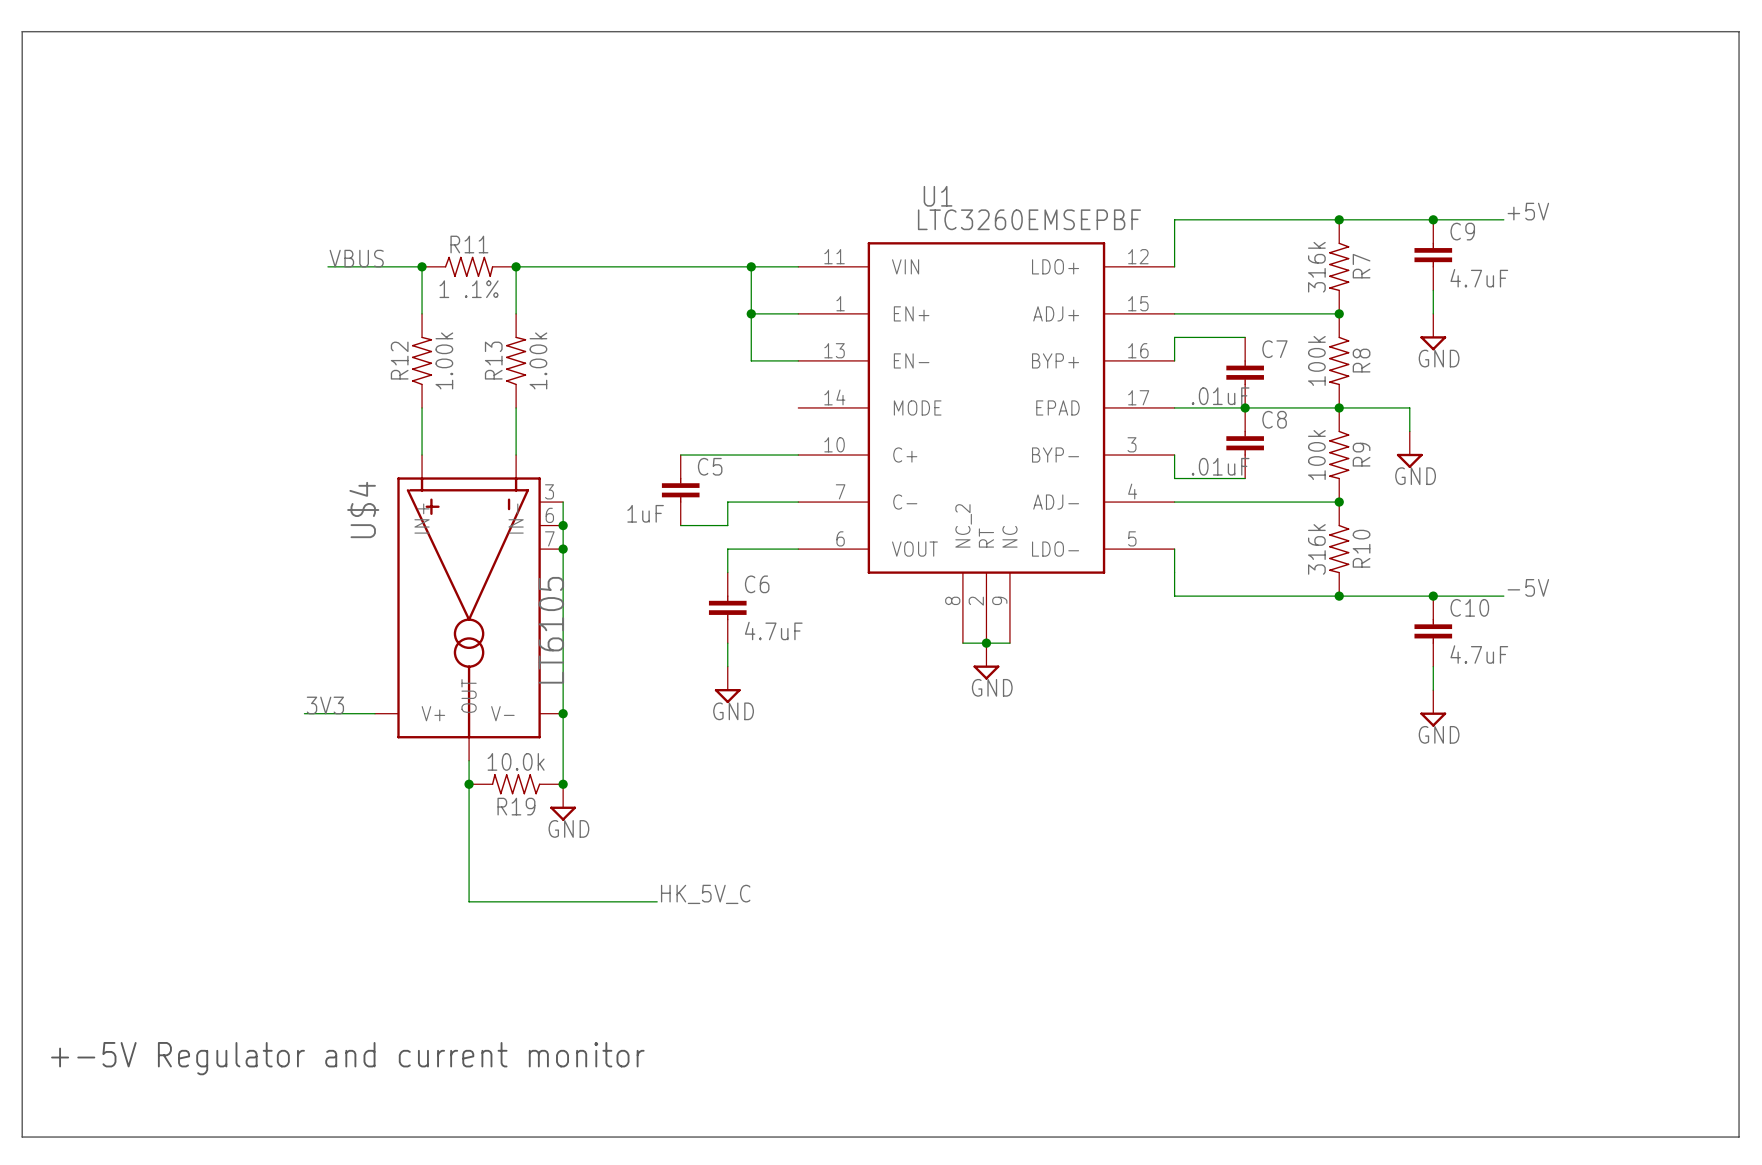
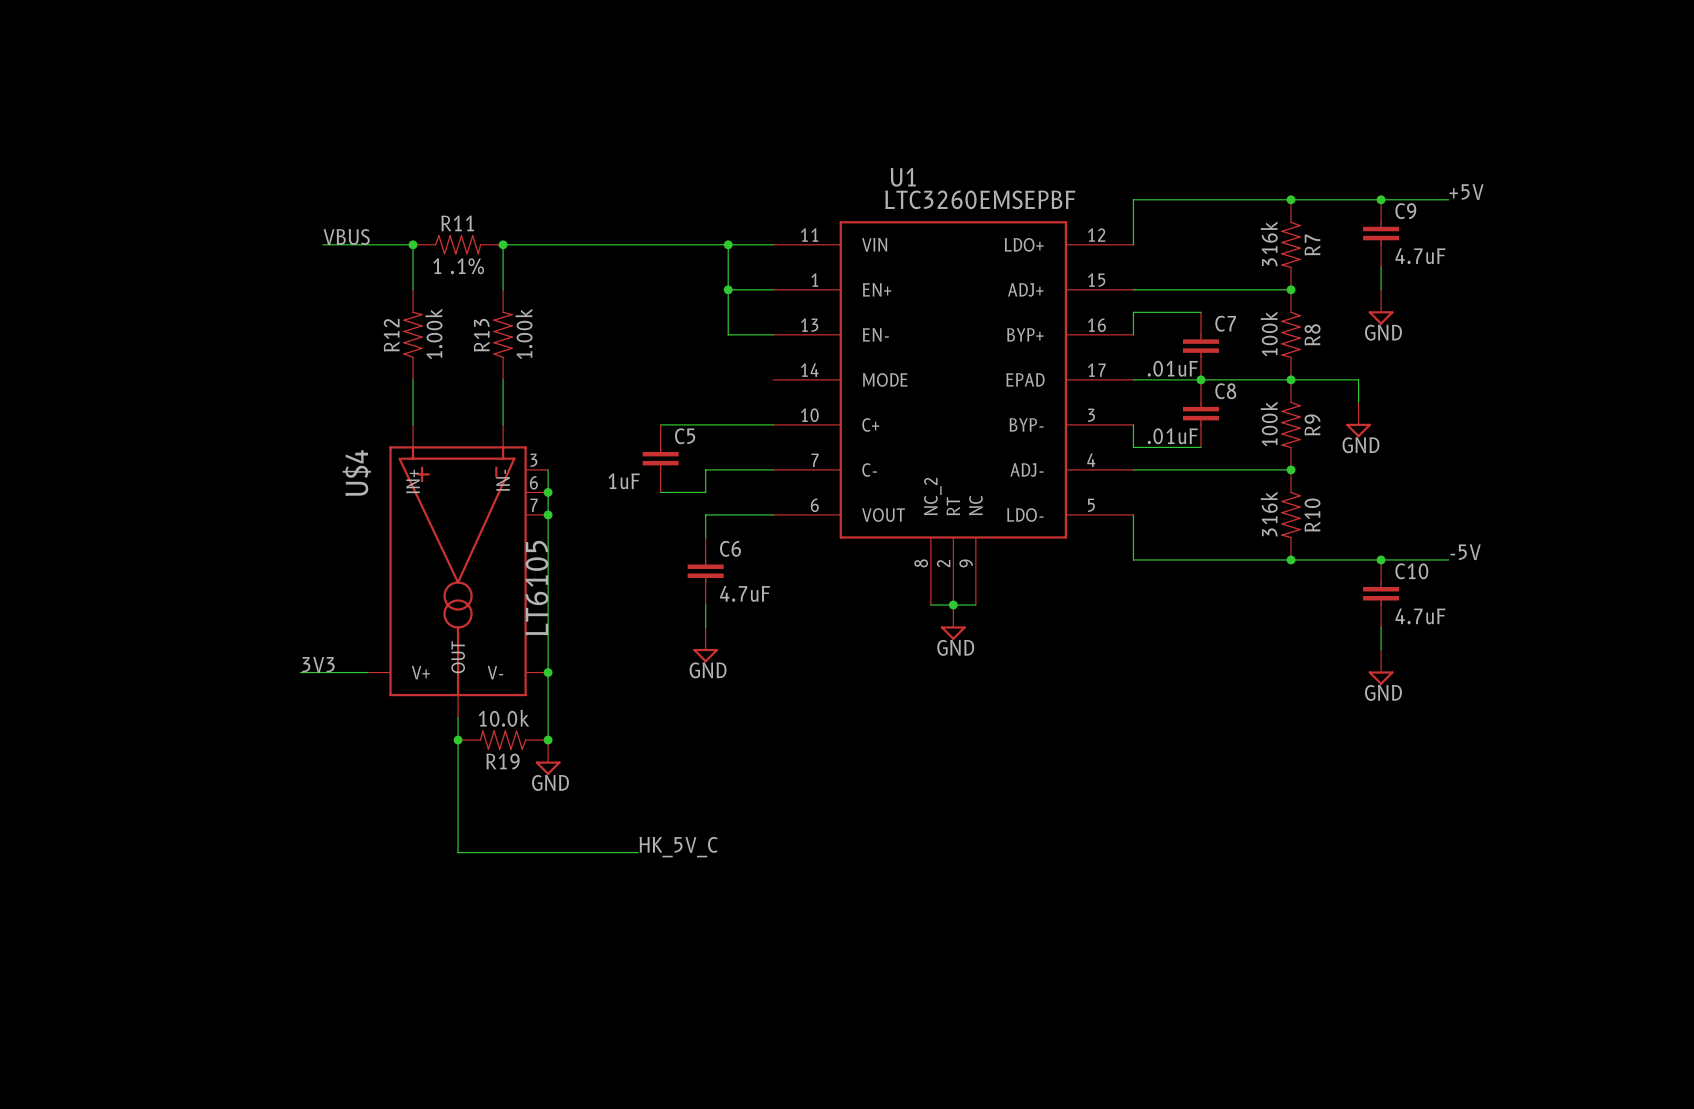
line: (22, 31) (22, 1137) (1739, 1137) (1739, 31) (22, 31) -> none
text: +-5V Regulator and current monitor (347, 1058) -> none

